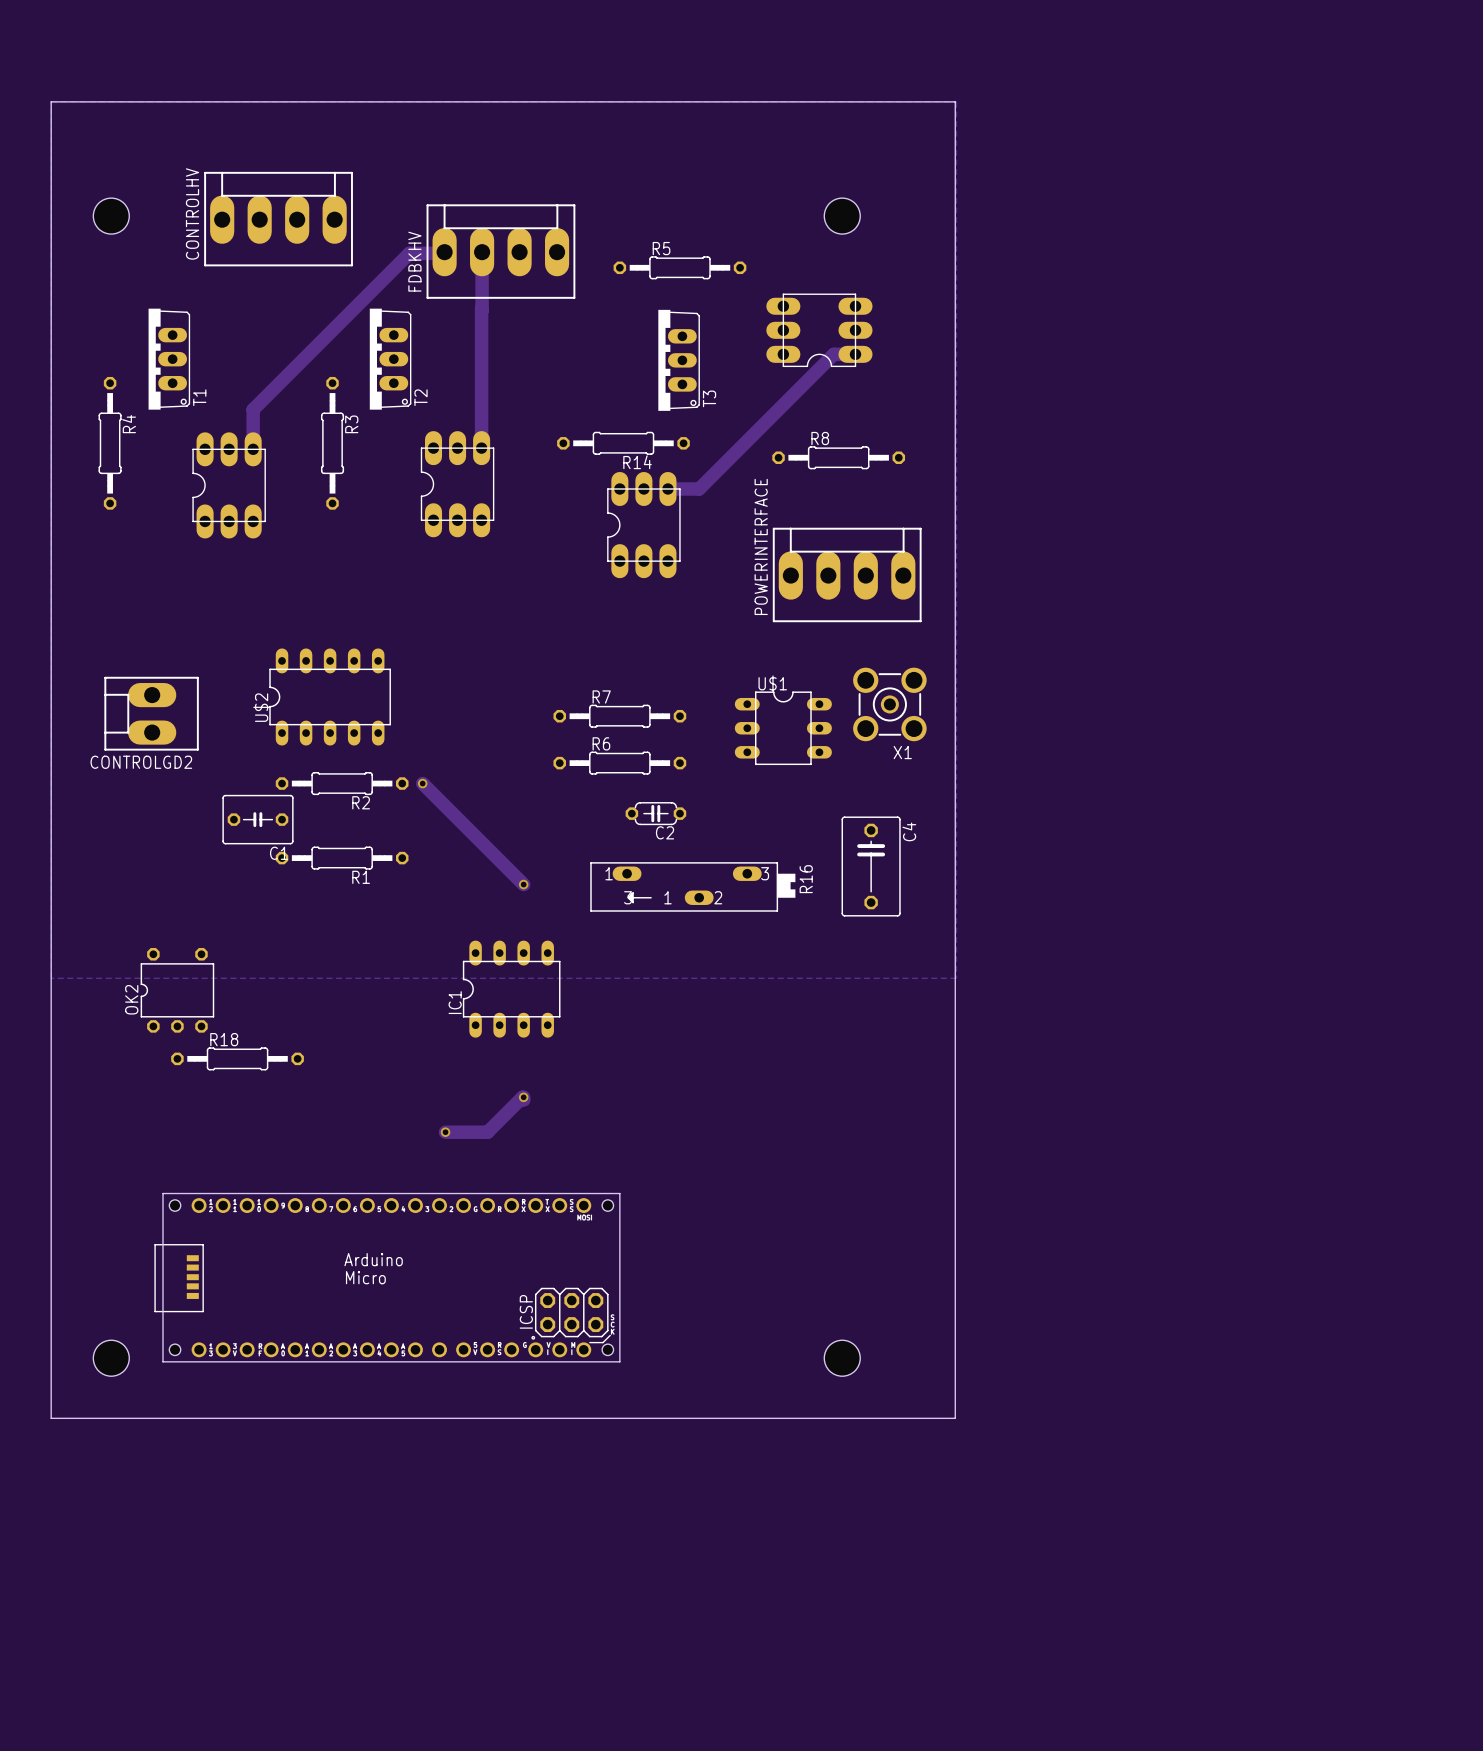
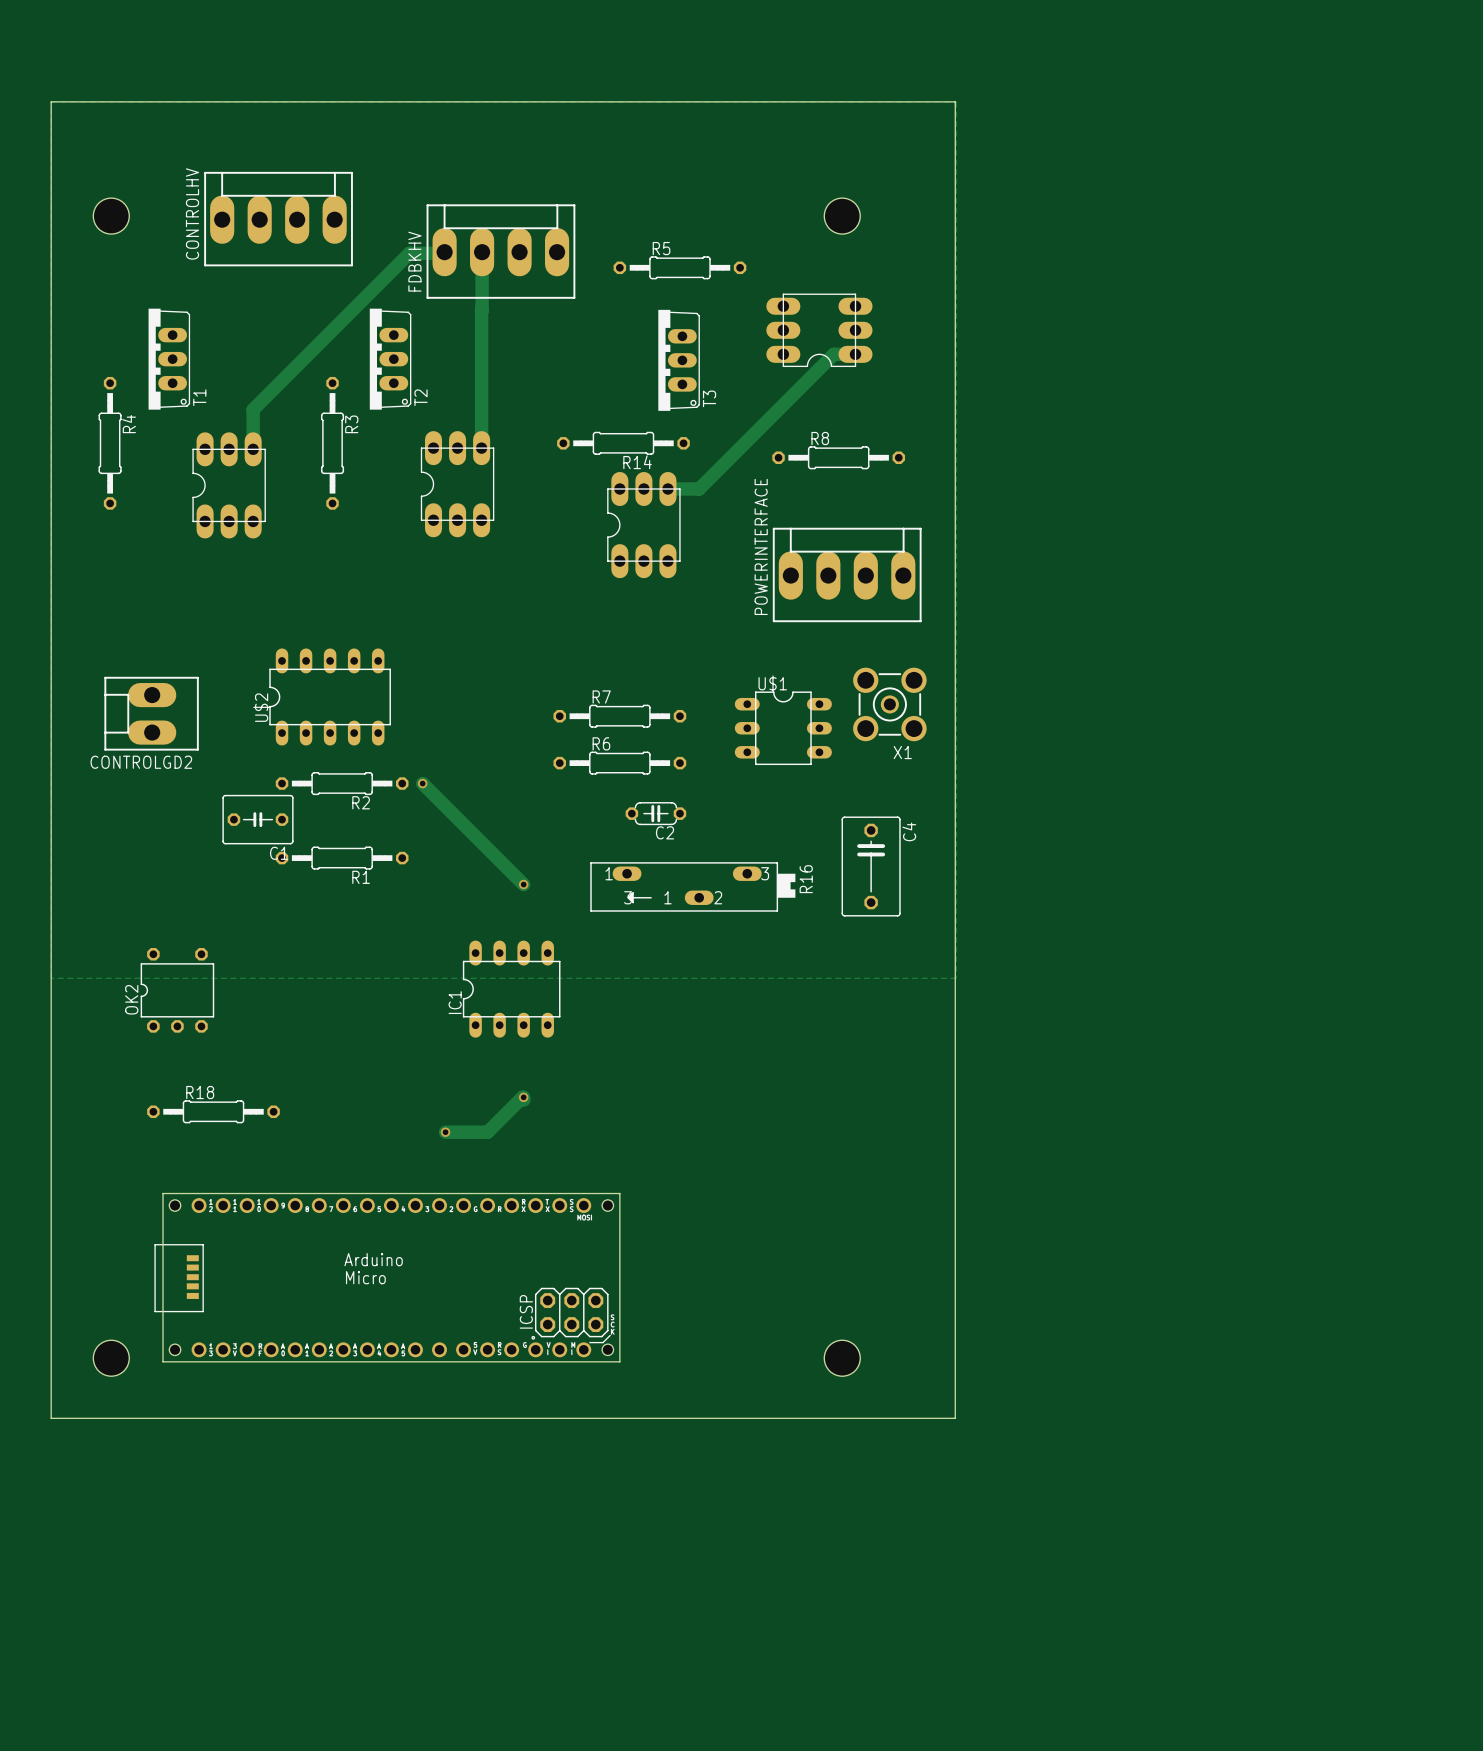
R18 position: (237, 1058) -> (213, 1111)

